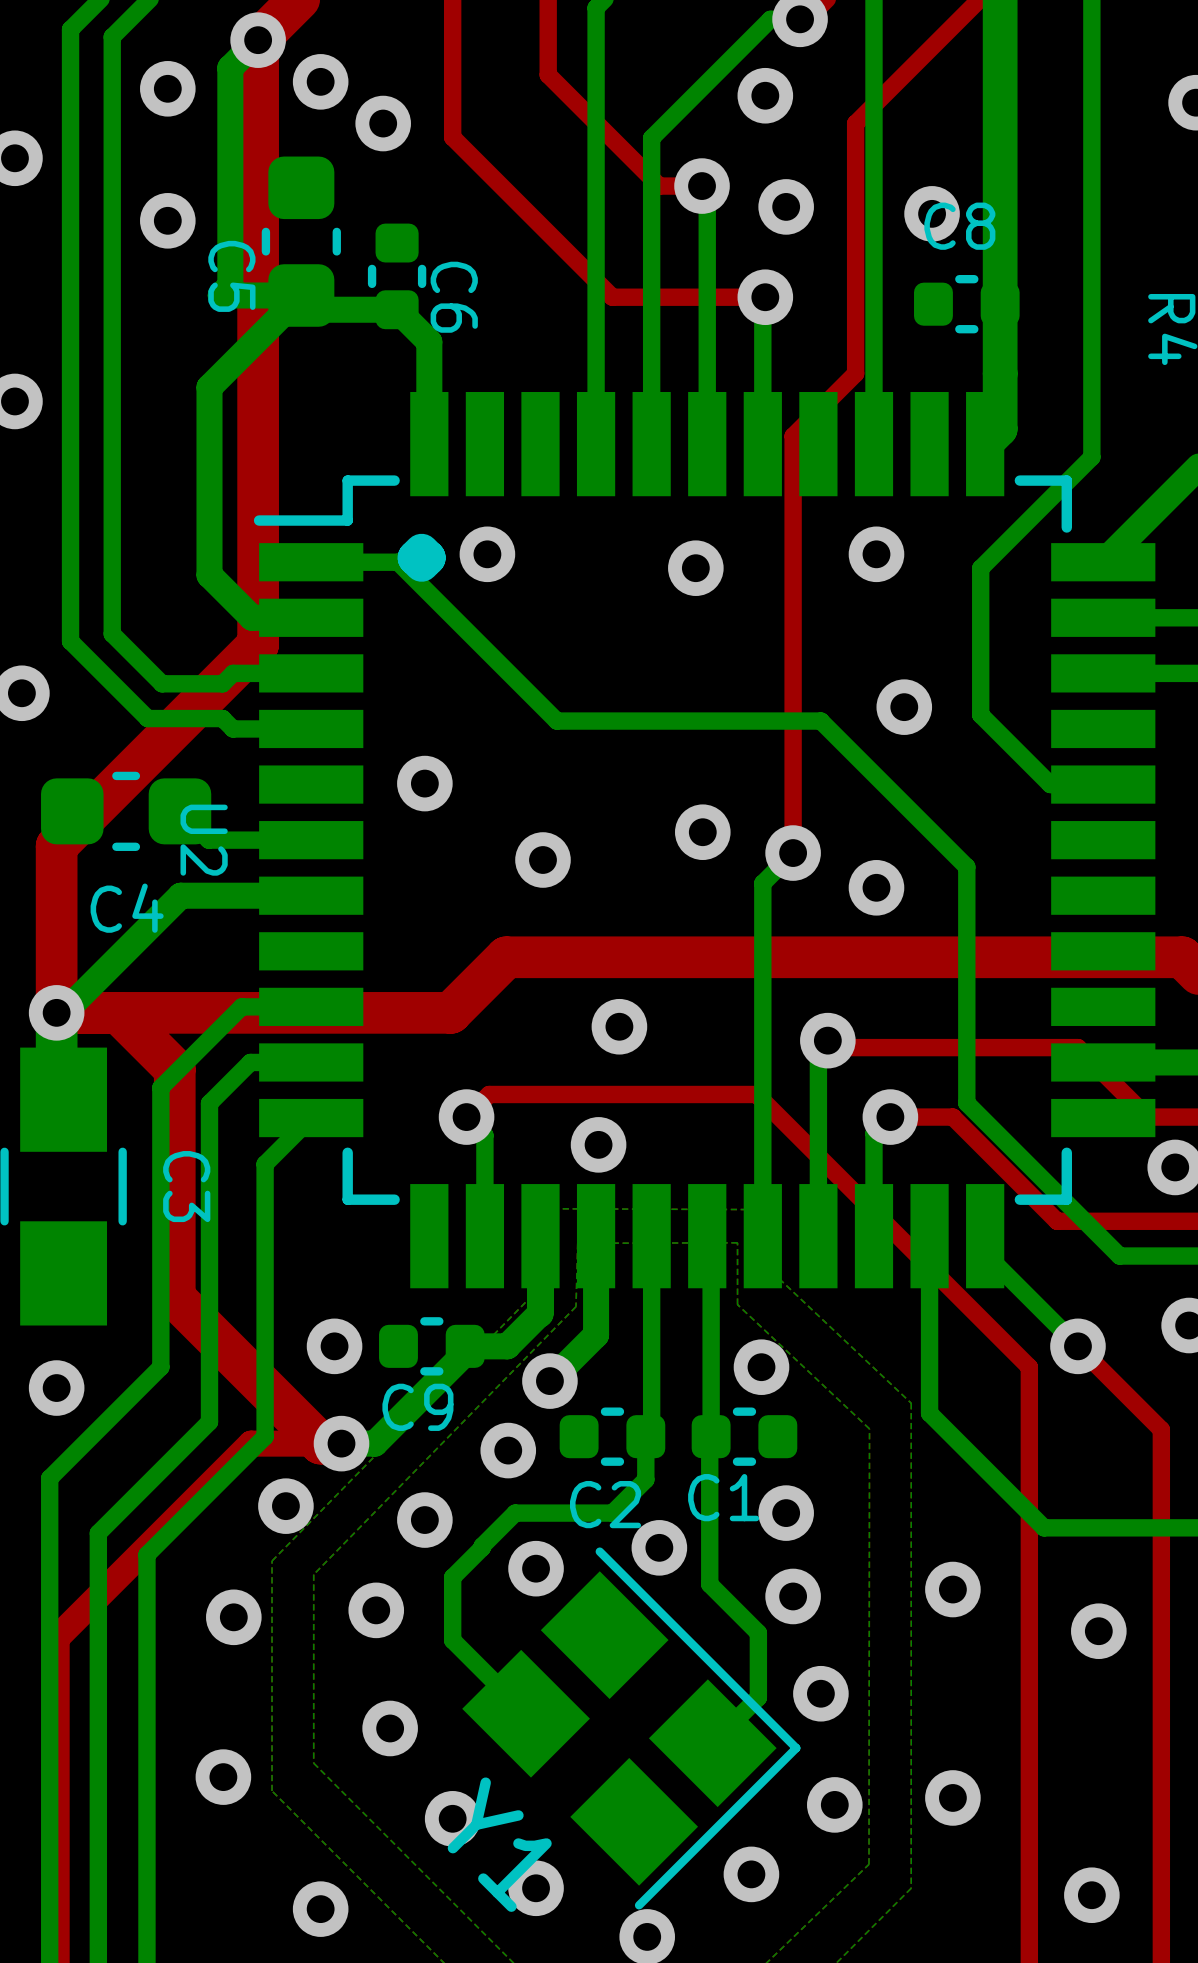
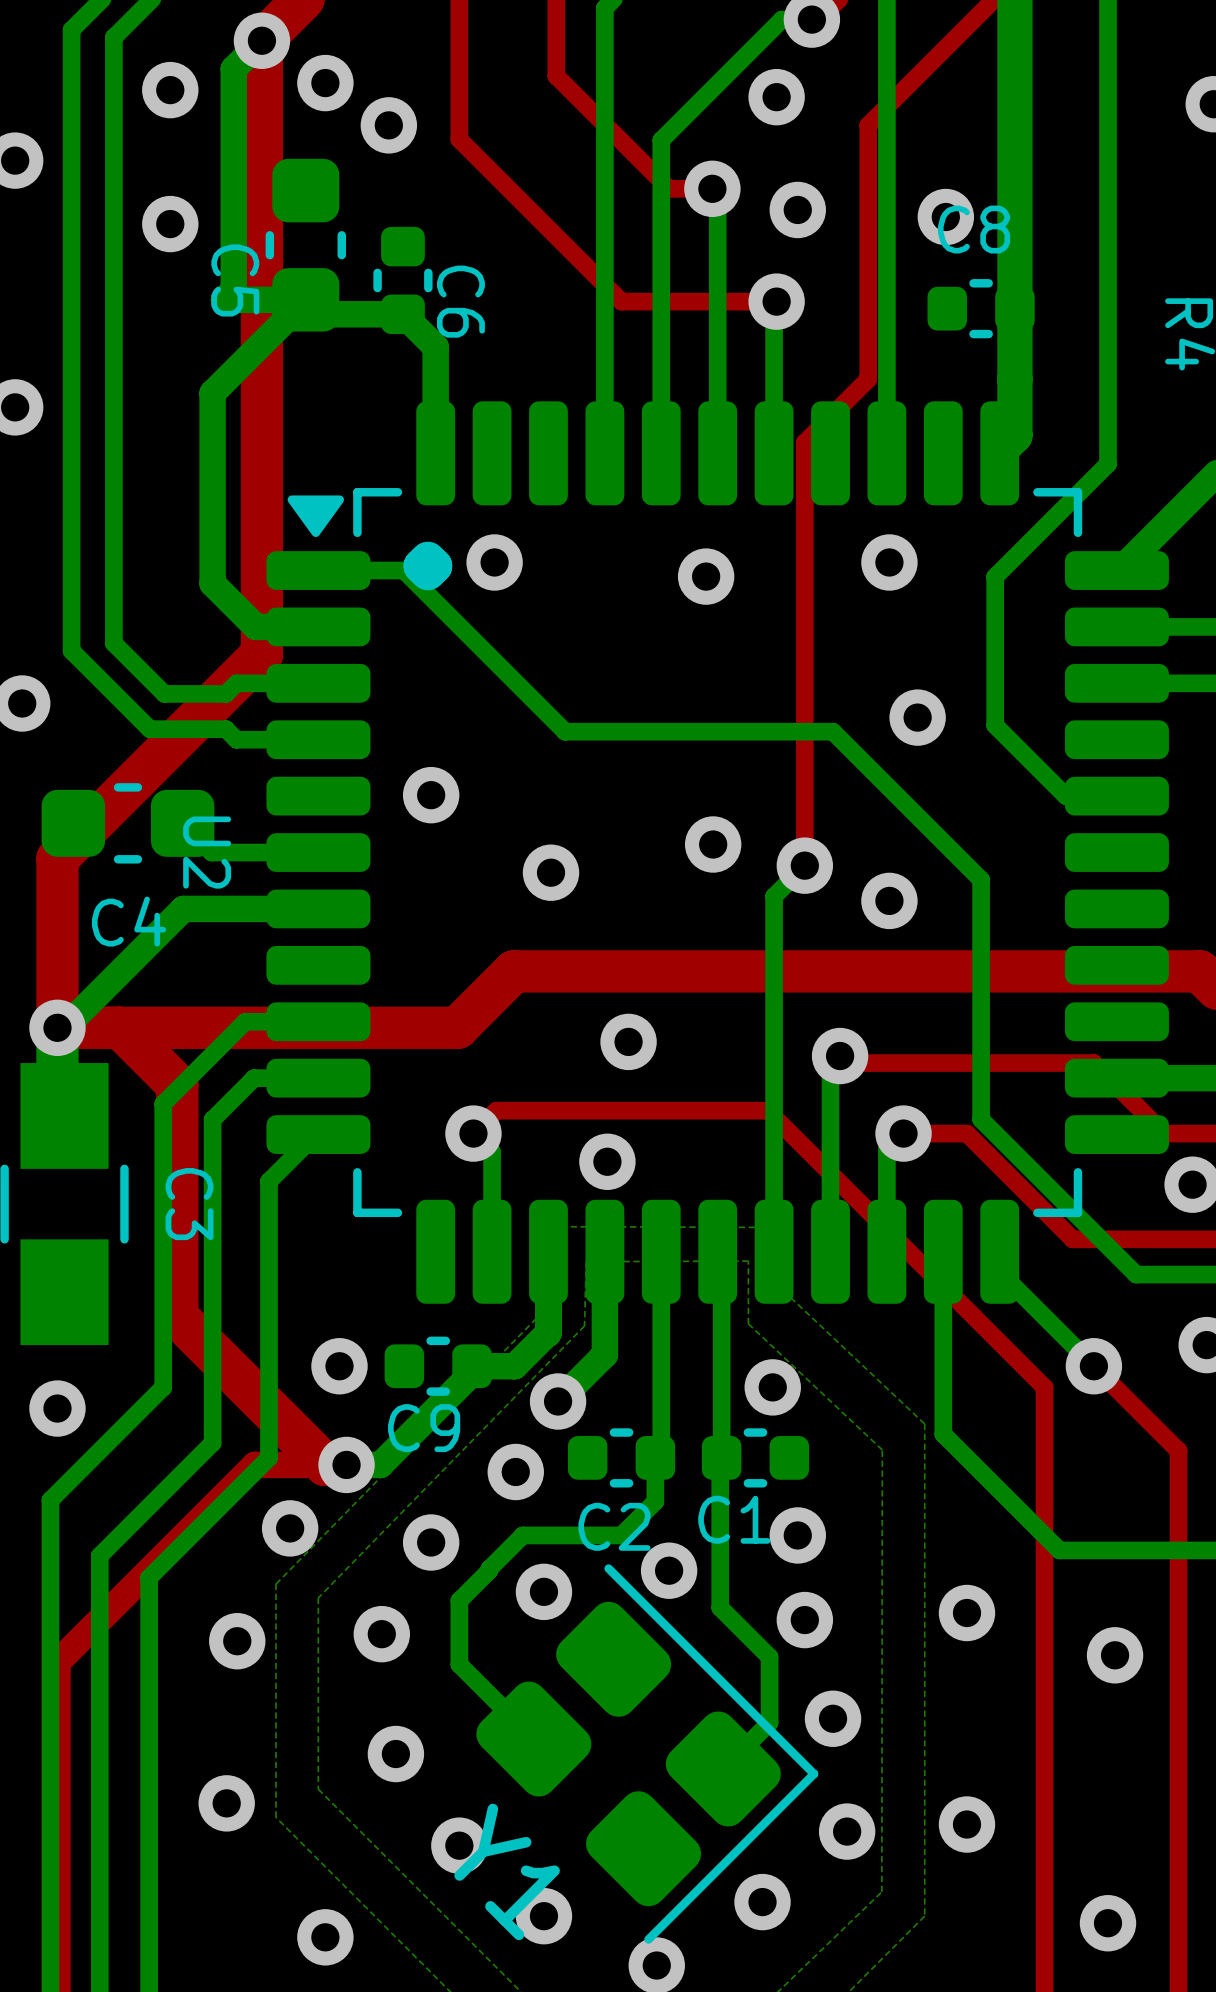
U2 footprint: [253, 392, 1156, 1289] -> [266, 401, 1169, 1304]
Y1 footprint: [462, 1547, 801, 1910] -> [476, 1564, 819, 1944]

